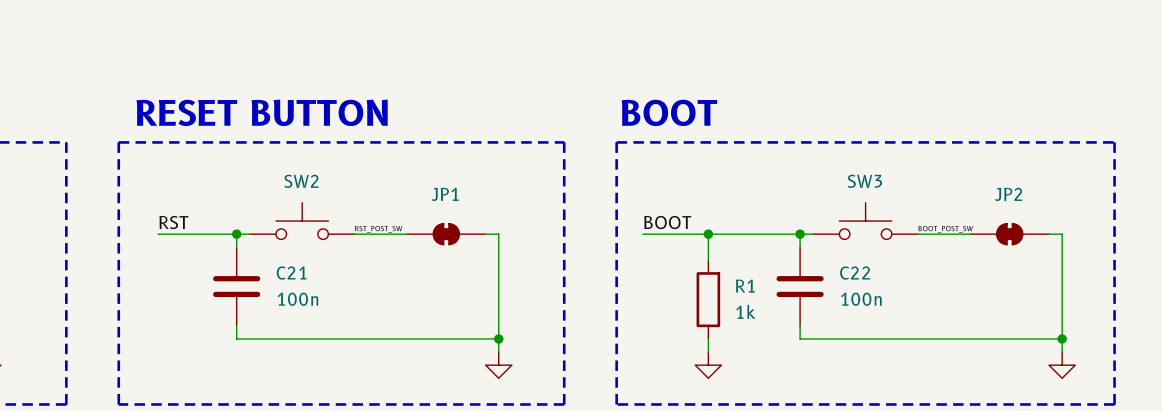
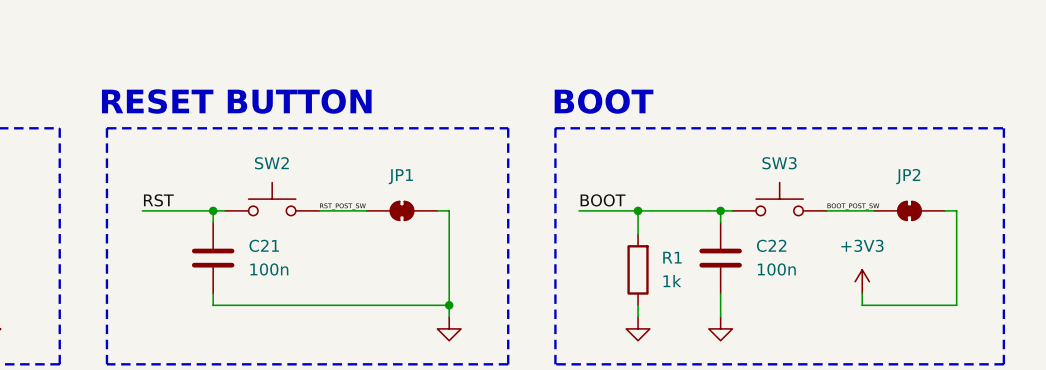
power symbol: none -> +3V3 (862, 281)
wire: (800, 338) (957, 338) -> (720, 305) (720, 317)
wire: (1062, 338) (1062, 352) -> (862, 293) (862, 305)
junction: (1062, 338) -> none
power symbol: none -> (720, 328)
power symbol: (1062, 365) -> none

